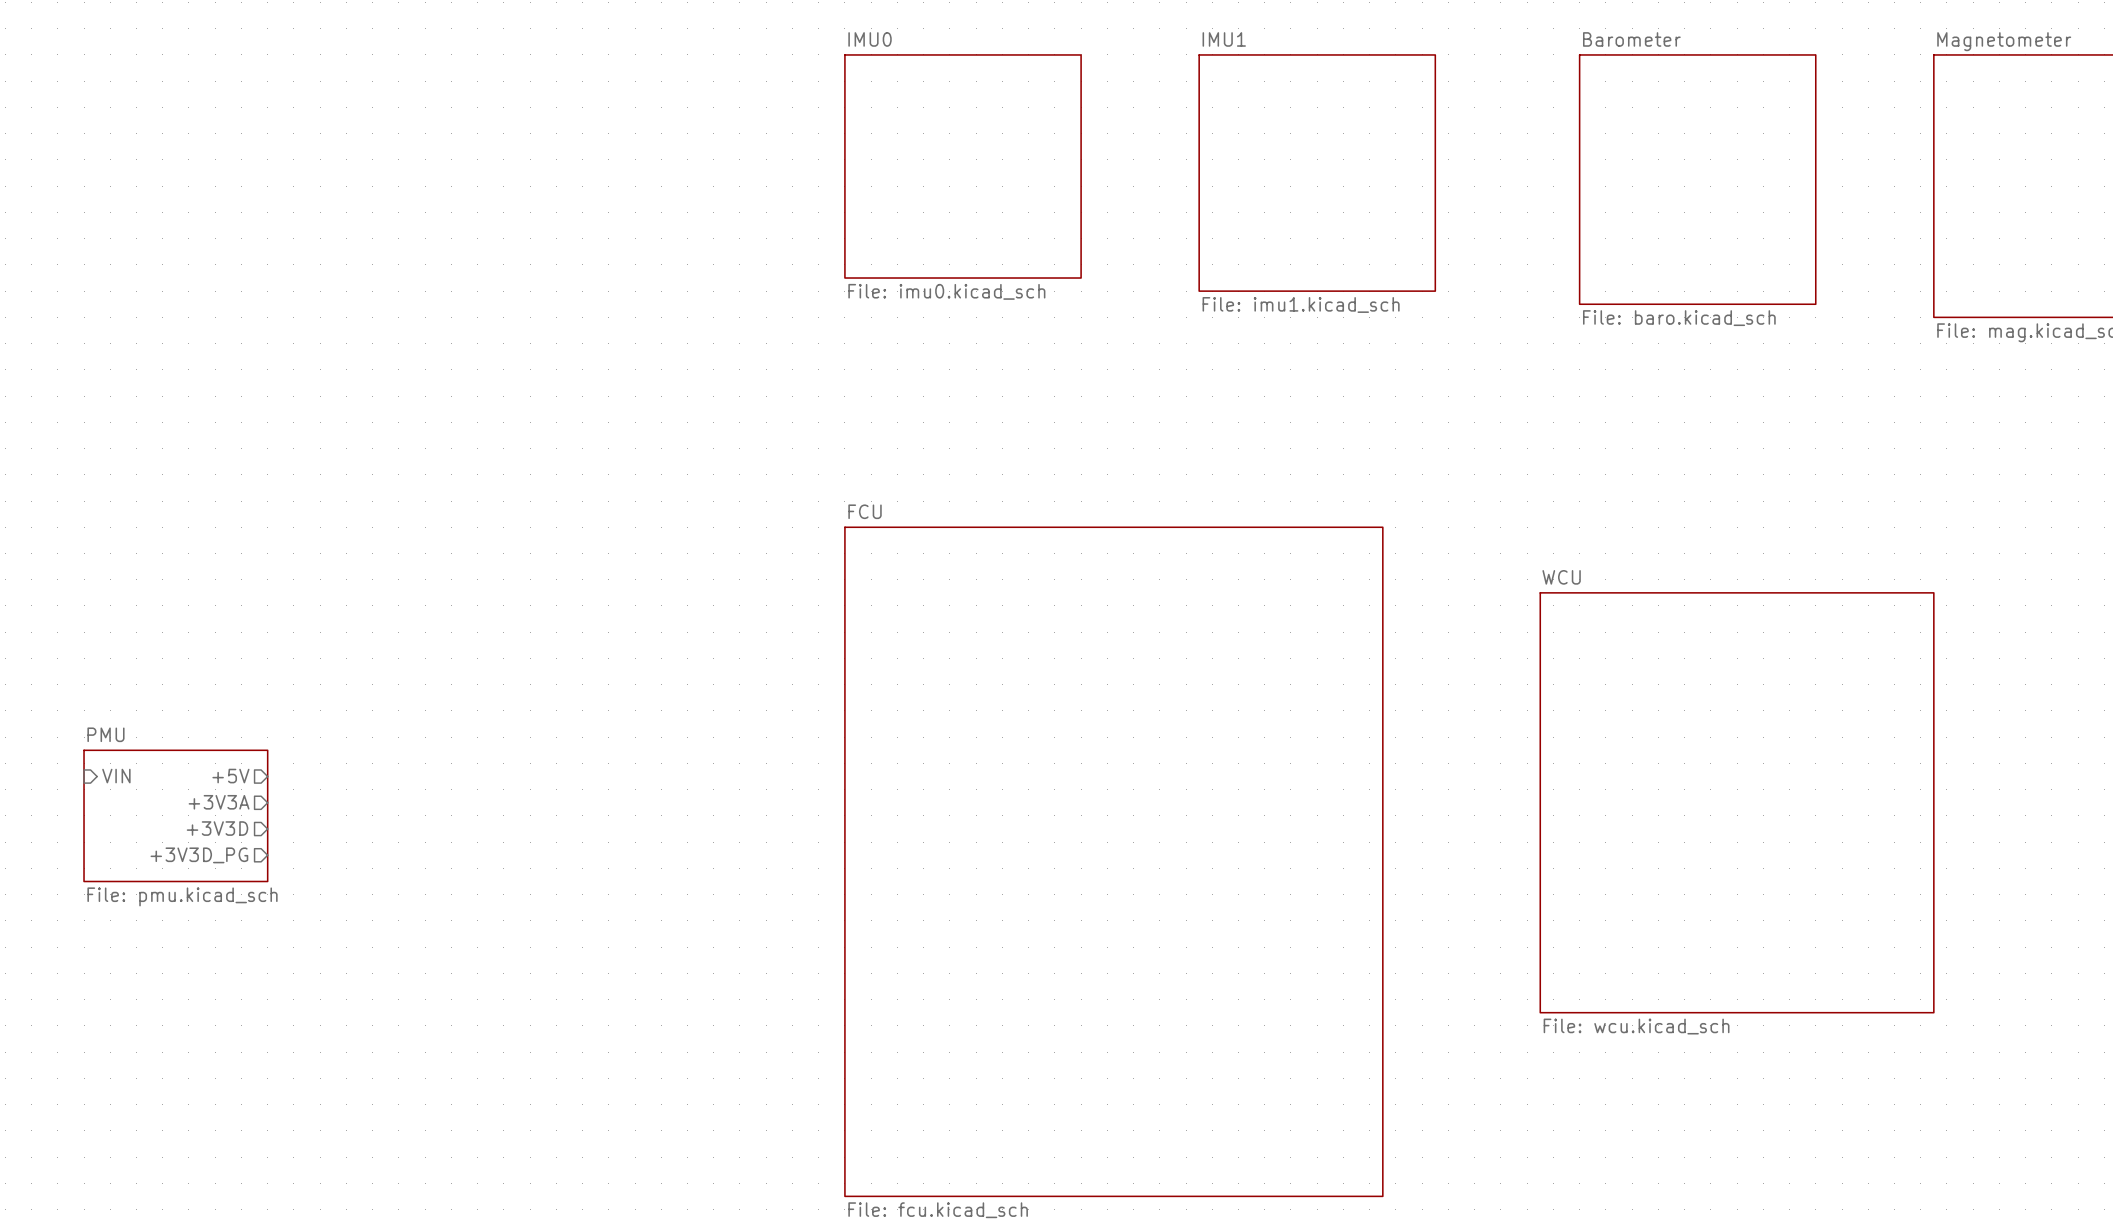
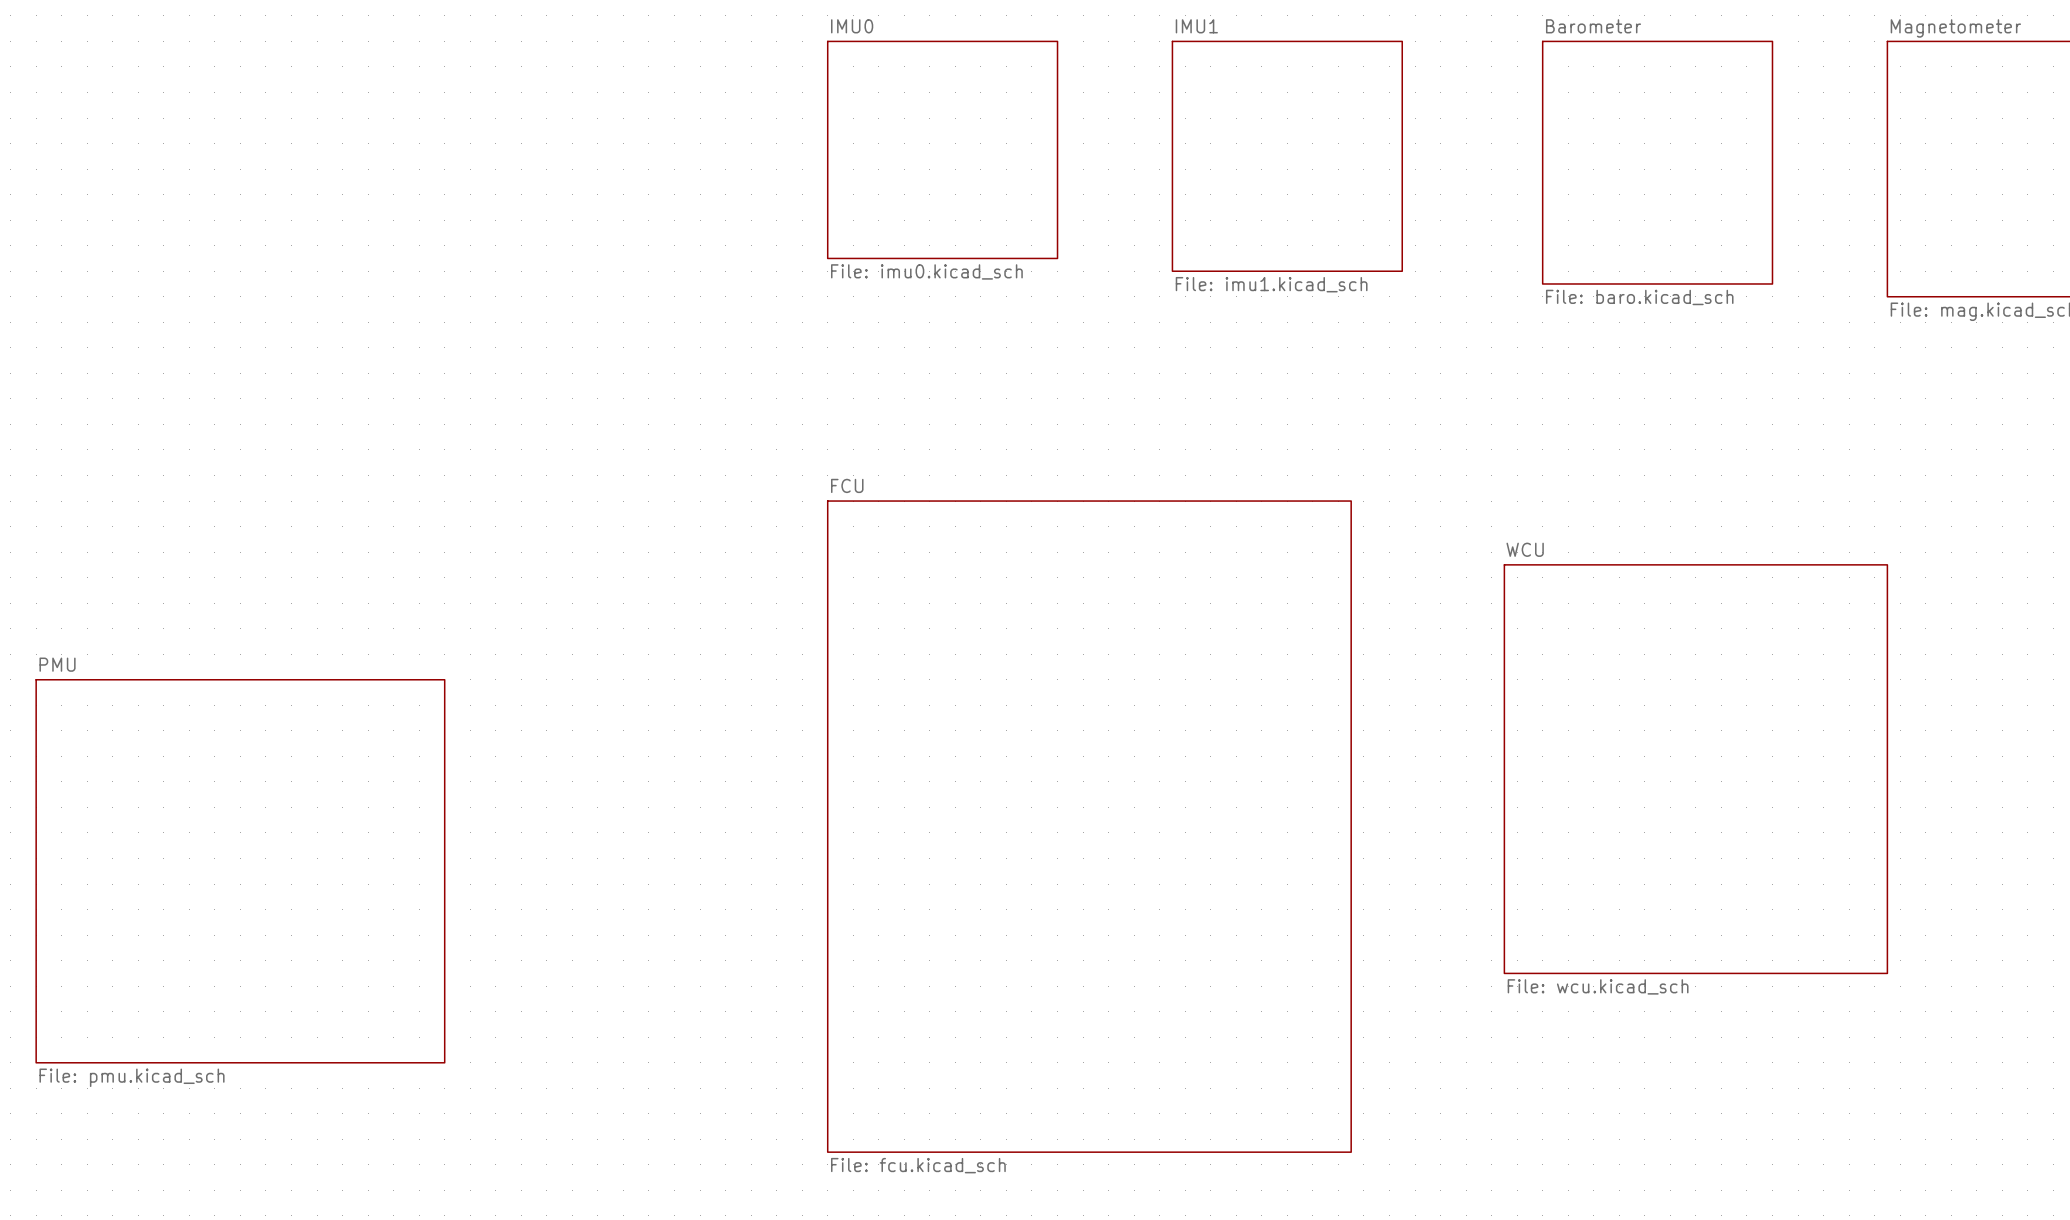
sheet pin: VIN (116, 776) -> none
sheet pin: +5V (230, 776) -> none
sheet pin: +3V3A (219, 802) -> none
sheet PMU: File: pmu.kicad_sch (175, 815) -> none
sheet pin: +3V3D (217, 828) -> none
sheet pin: +3V3D_PG (199, 855) -> none
sheet PMU: none -> File: pmu.kicad_sch (240, 871)

